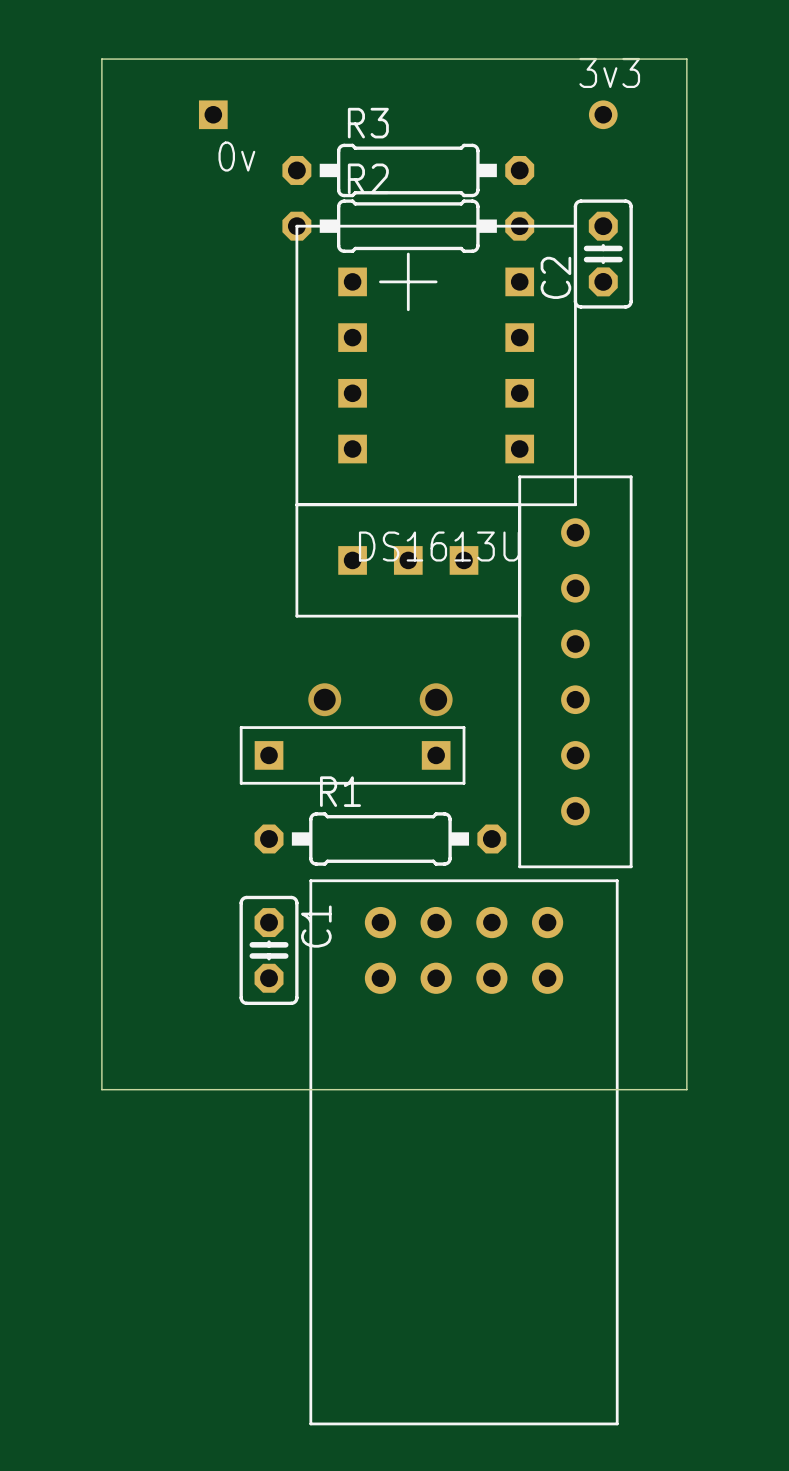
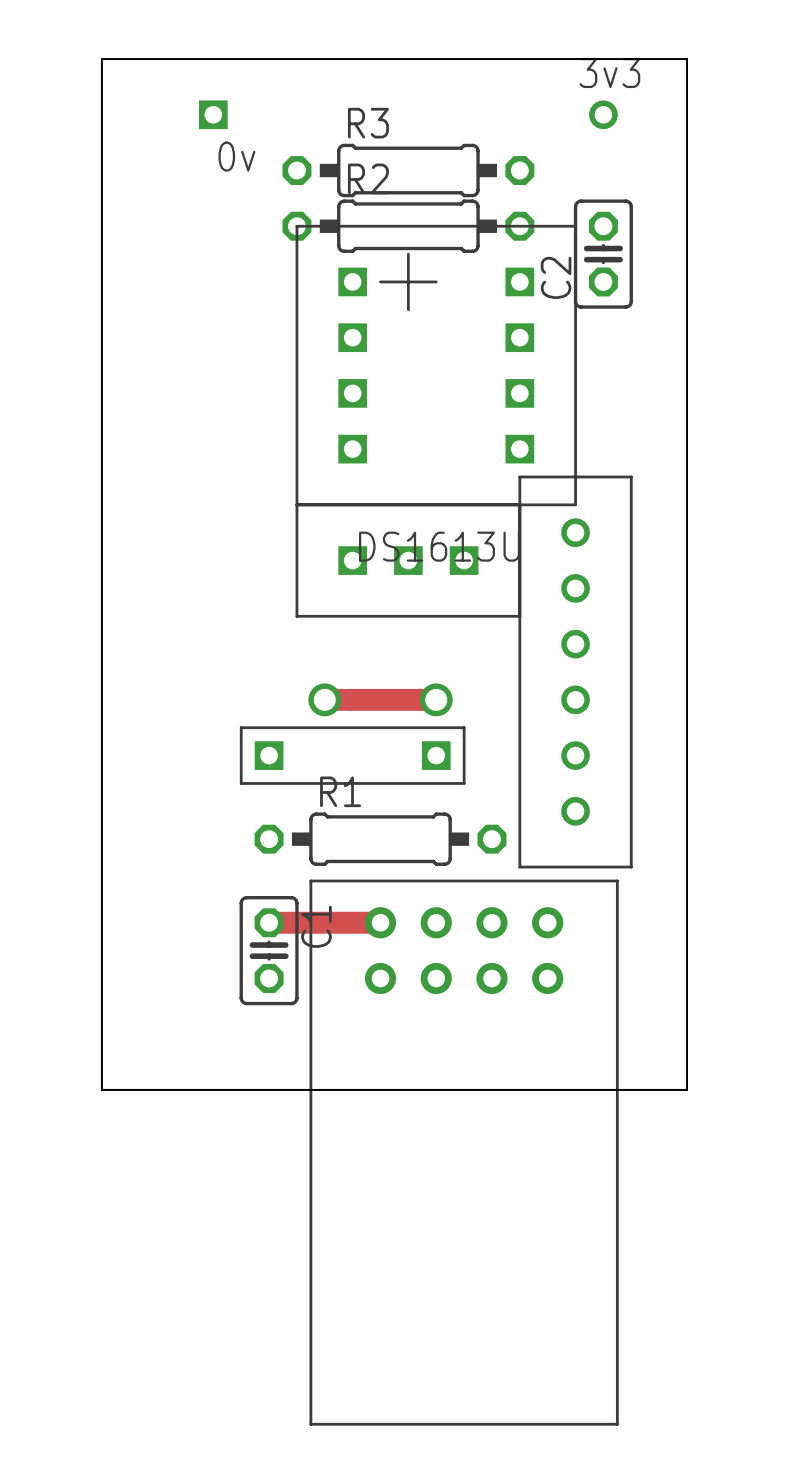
track: none -> (324, 699) (436, 699)
track: none -> (269, 922) (380, 922)

